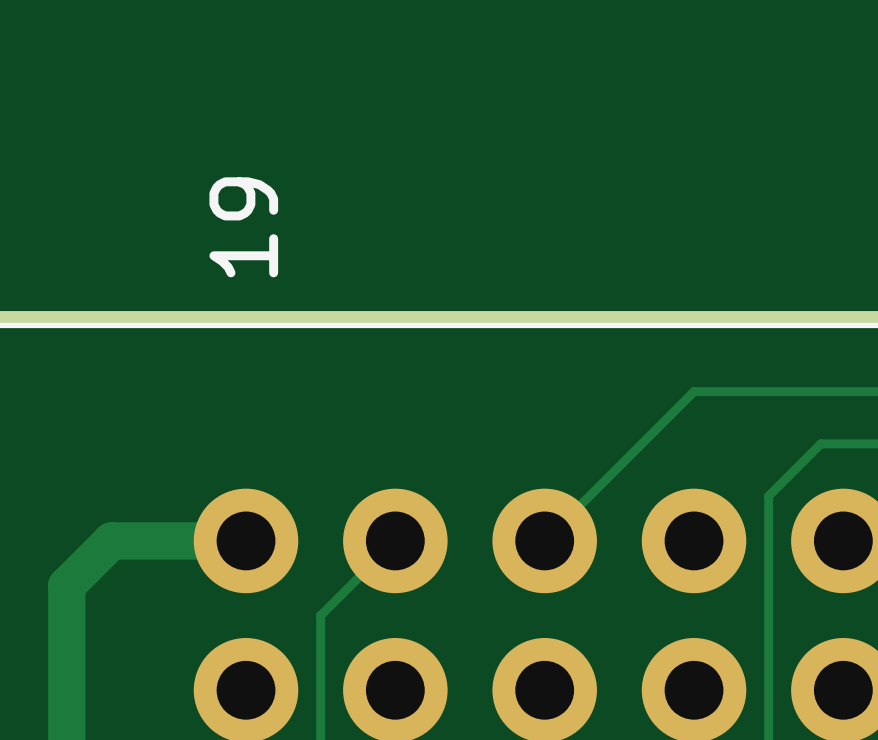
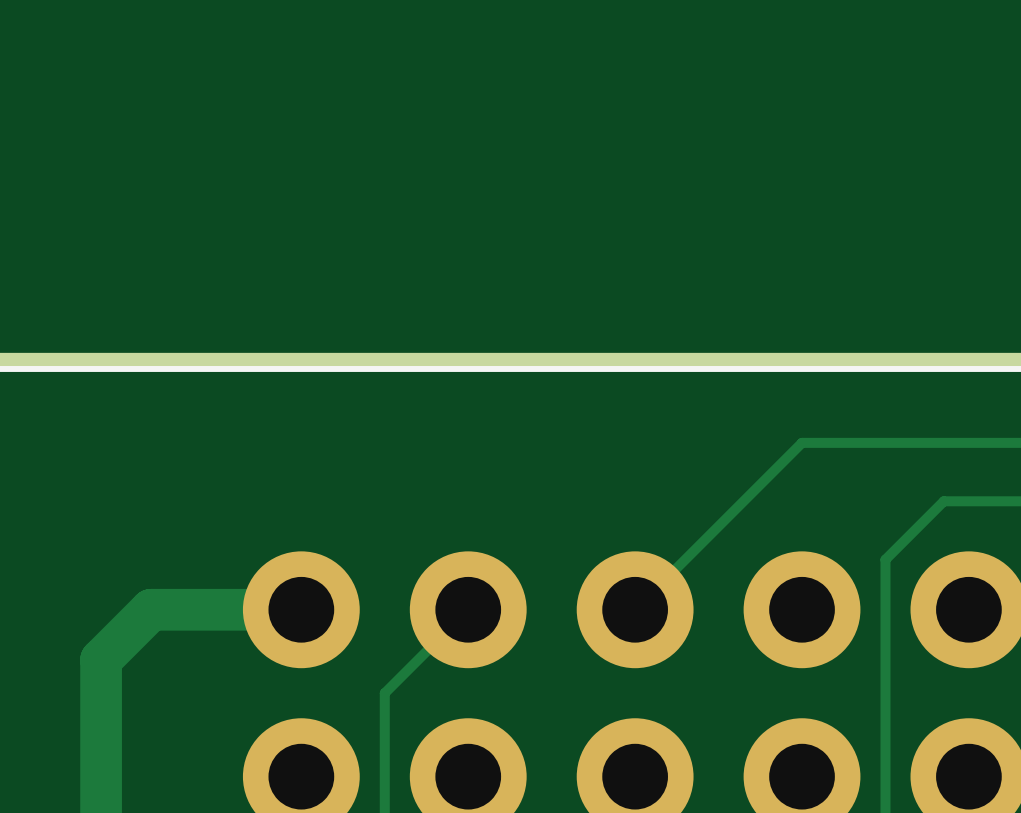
part text: 19 (243, 227) -> none

